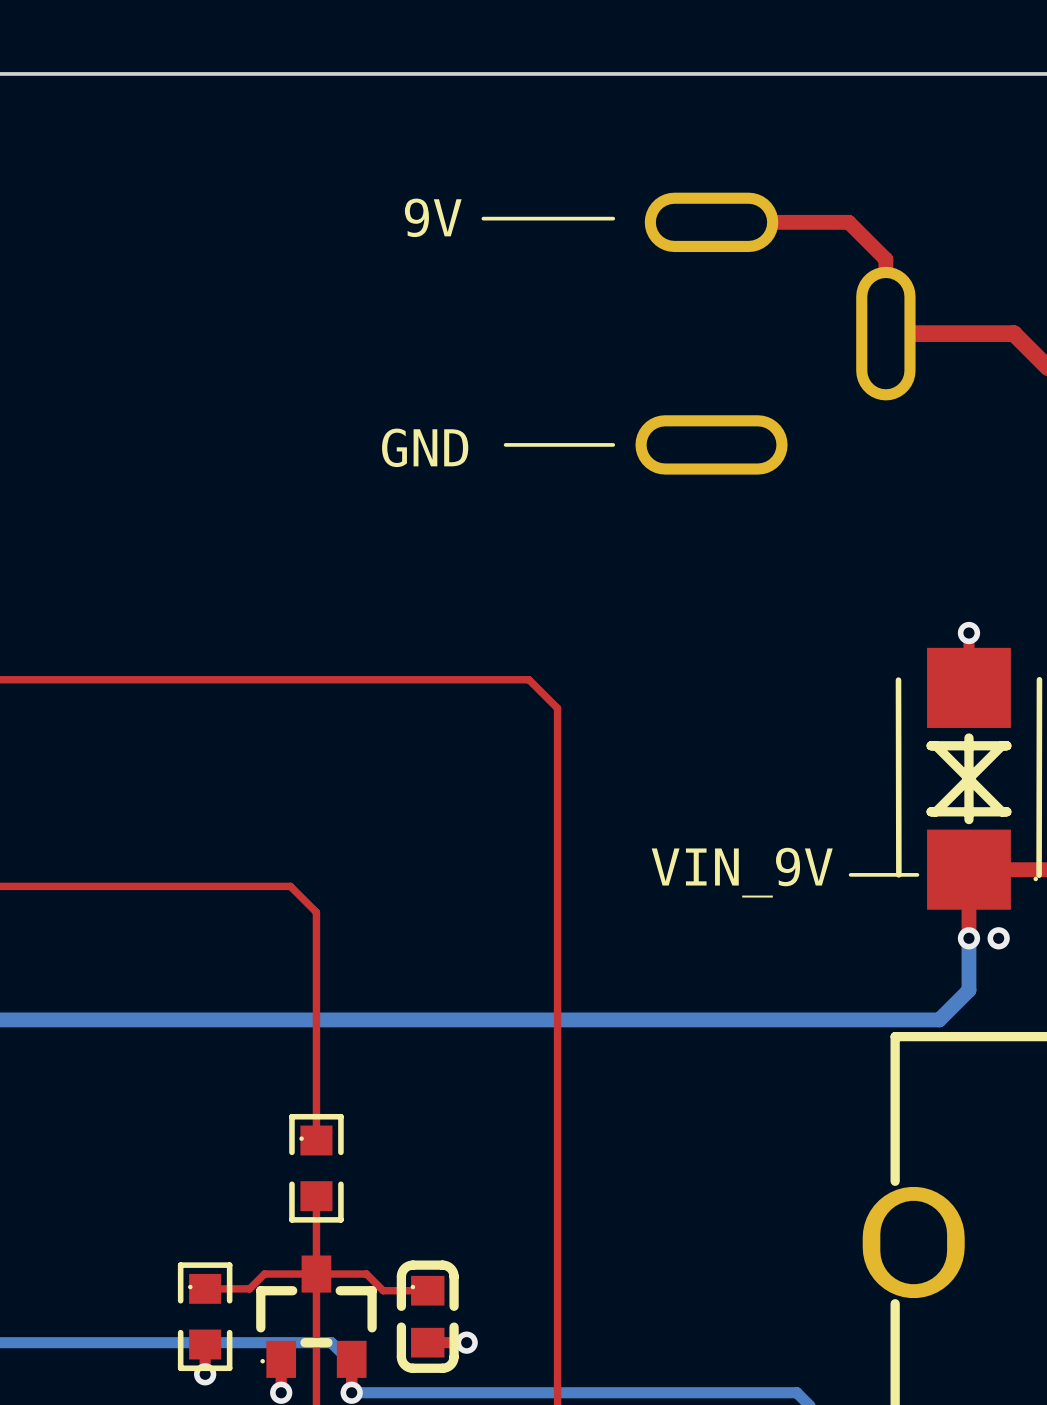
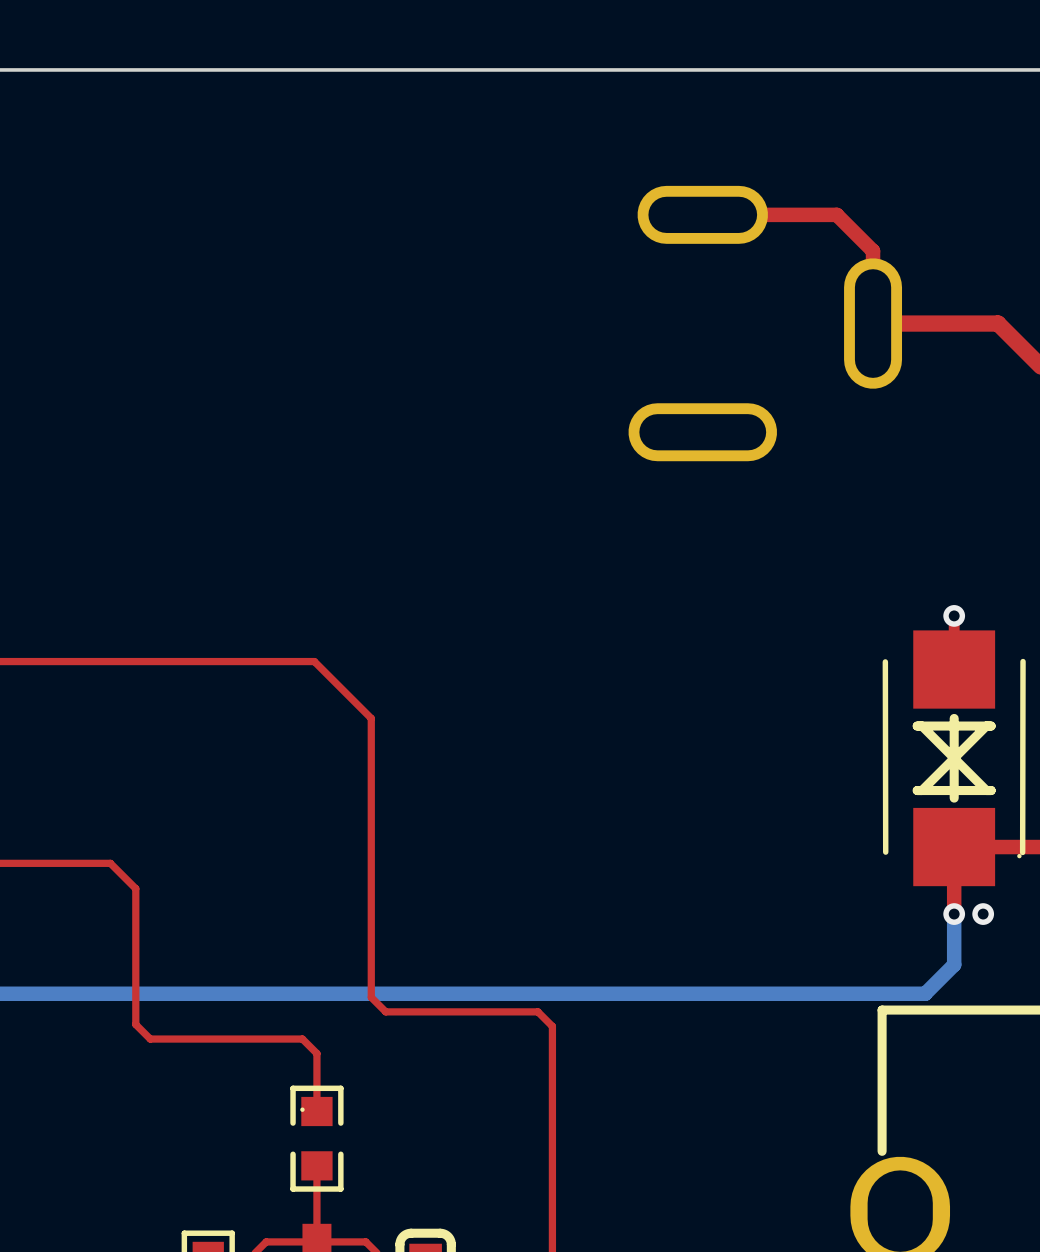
text: 9V (433, 217) -> none
line: (483, 218) (613, 218) -> none
line: (505, 444) (613, 444) -> none
text: GND (425, 447) -> none
top track: (313, 679) (529, 679) (557, 708) (557, 1053) -> (314, 661) (371, 718) (371, 997) (385, 1011) (537, 1011) (552, 1026)
text: VIN_9V (742, 872) -> none
line: (850, 874) (917, 874) -> none
top track: (104, 886) (290, 886) (316, 912) (316, 1081) -> (110, 863) (135, 888) (135, 1024) (150, 1039) (302, 1039) (316, 1053)

